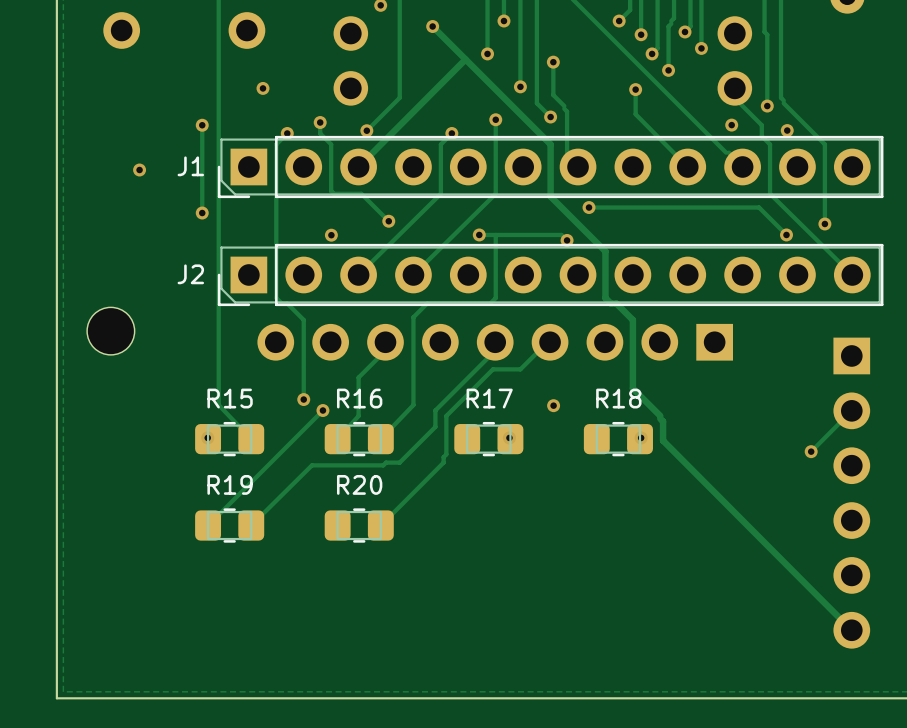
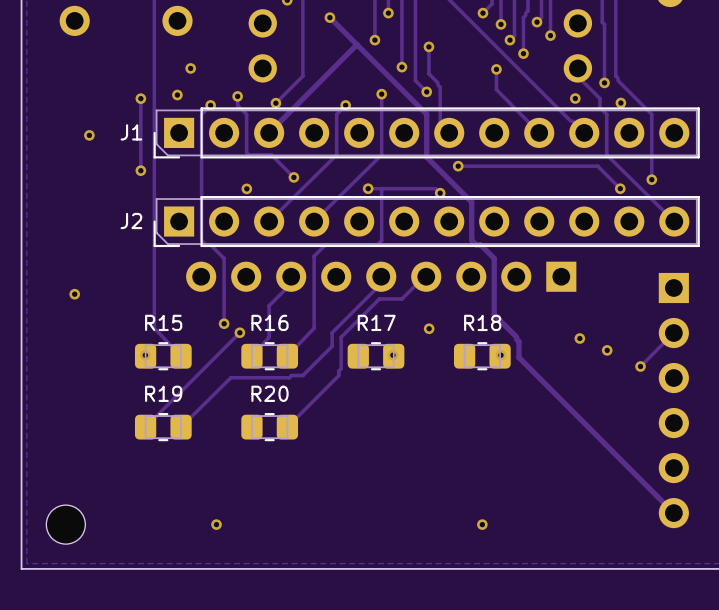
via: none -> (177, 95)
part position: (110, 331) -> (65, 524)
via: none -> (74, 294)
via: none -> (579, 338)
via: none -> (607, 350)
via: none -> (216, 524)
via: none -> (482, 524)

